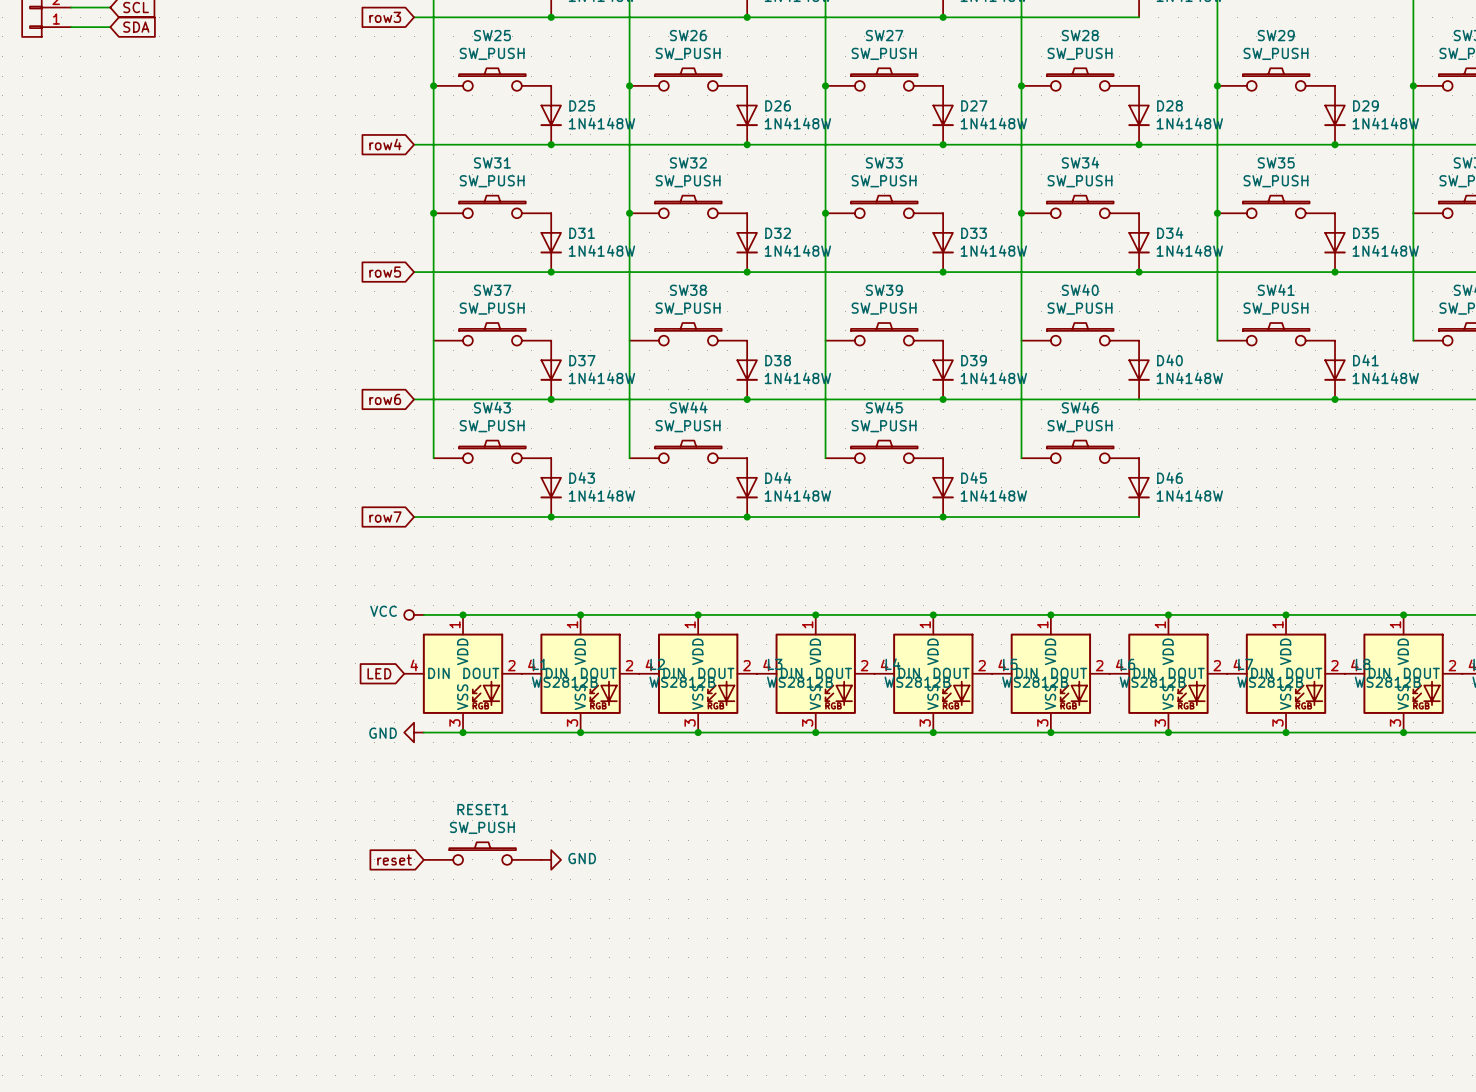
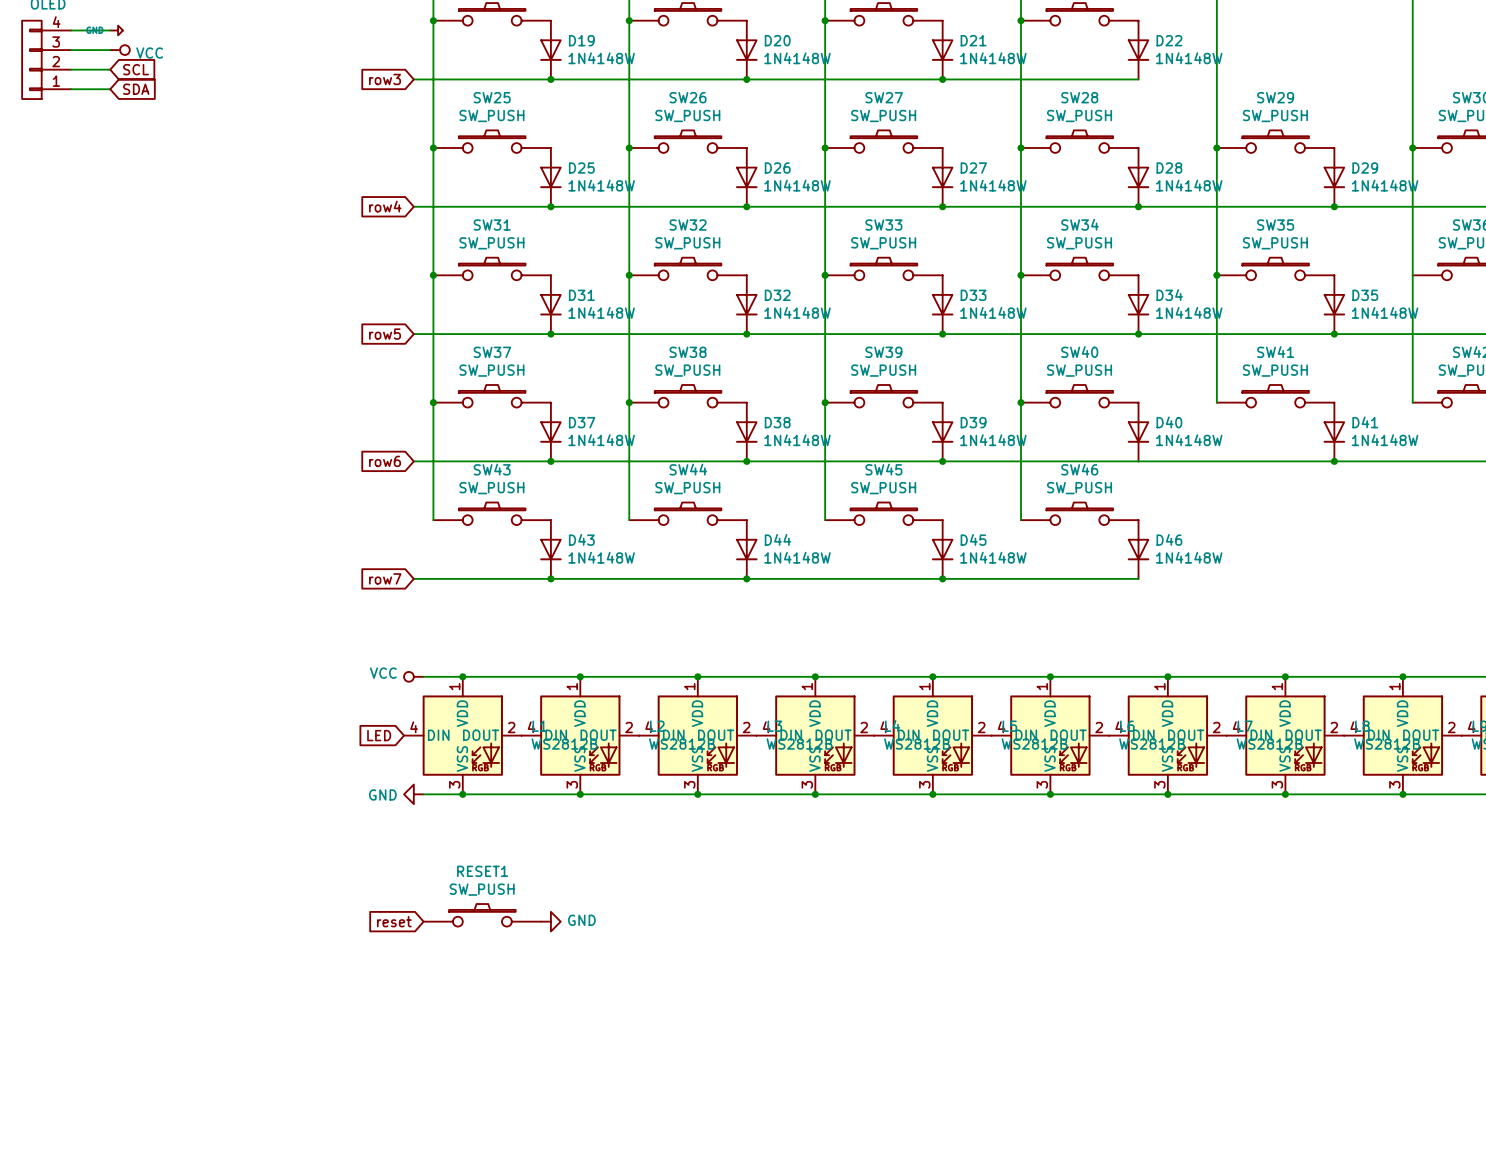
junction: none -> (433, 402)
junction: none -> (629, 402)
junction: none -> (825, 402)
junction: none -> (1021, 402)

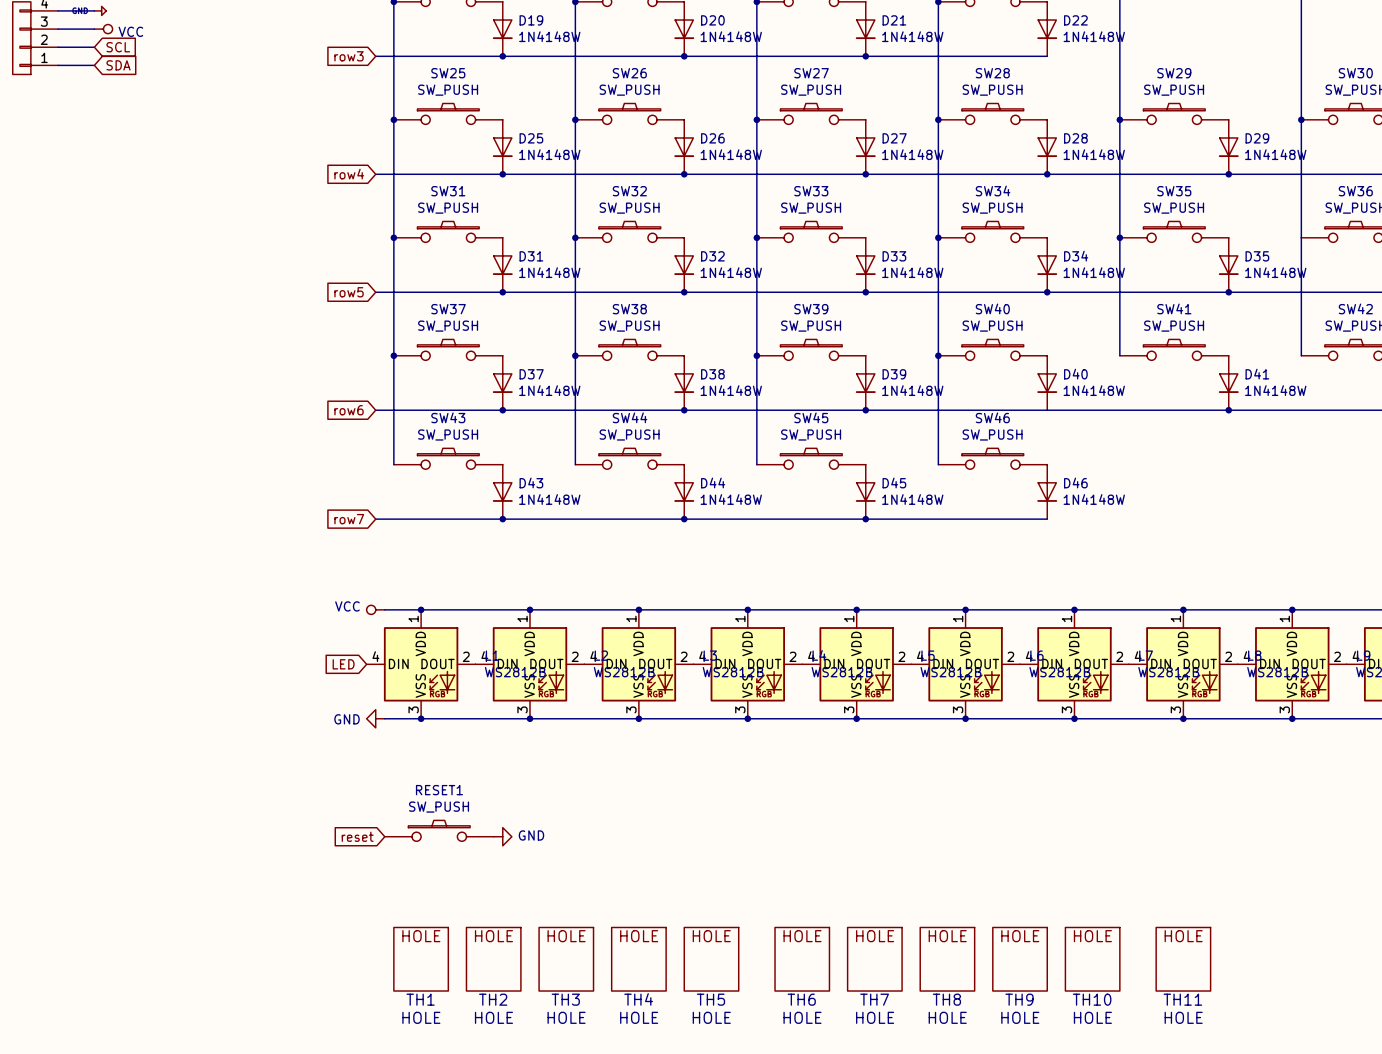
TH1: none -> HOLE (421, 959)
TH2: none -> HOLE (493, 959)
TH3: none -> HOLE (566, 959)
TH4: none -> HOLE (638, 959)
TH5: none -> HOLE (711, 959)
TH6: none -> HOLE (802, 959)
TH7: none -> HOLE (874, 959)
TH8: none -> HOLE (947, 959)
TH9: none -> HOLE (1020, 959)
TH10: none -> HOLE (1092, 959)
TH11: none -> HOLE (1183, 959)

